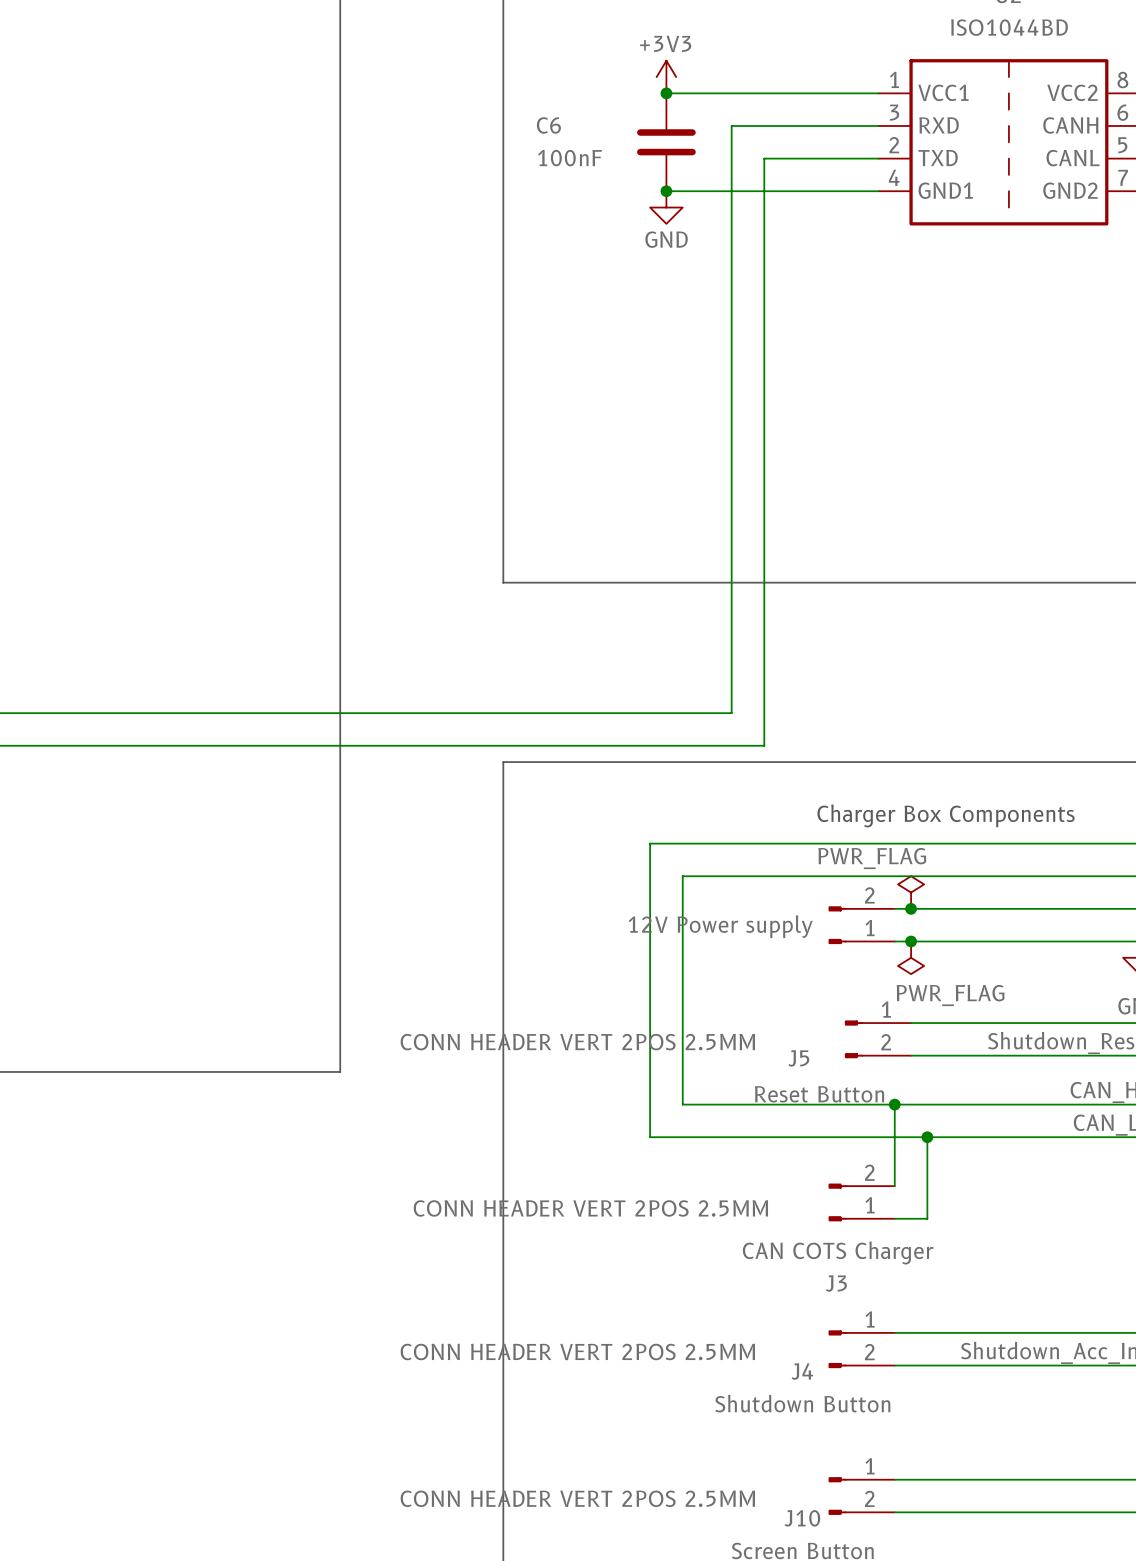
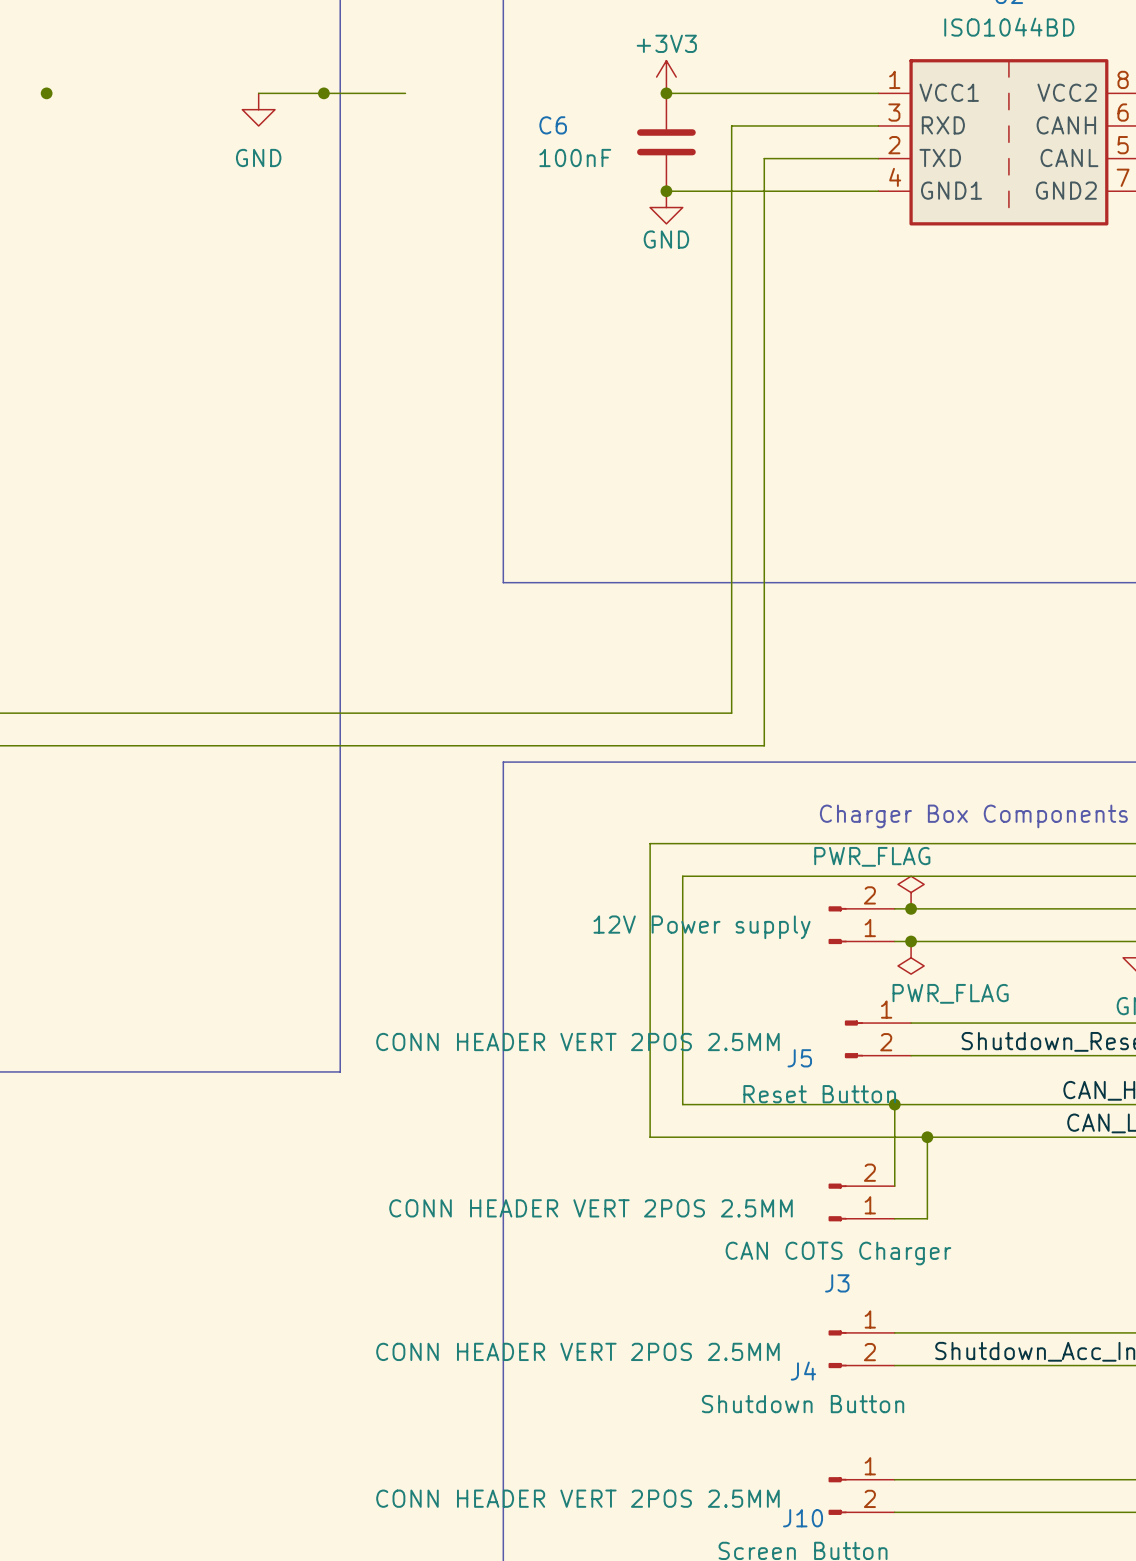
junction: none -> (46, 93)
wire: none -> (258, 93) (405, 93)
junction: none -> (323, 93)
power symbol: none -> GND (258, 109)

